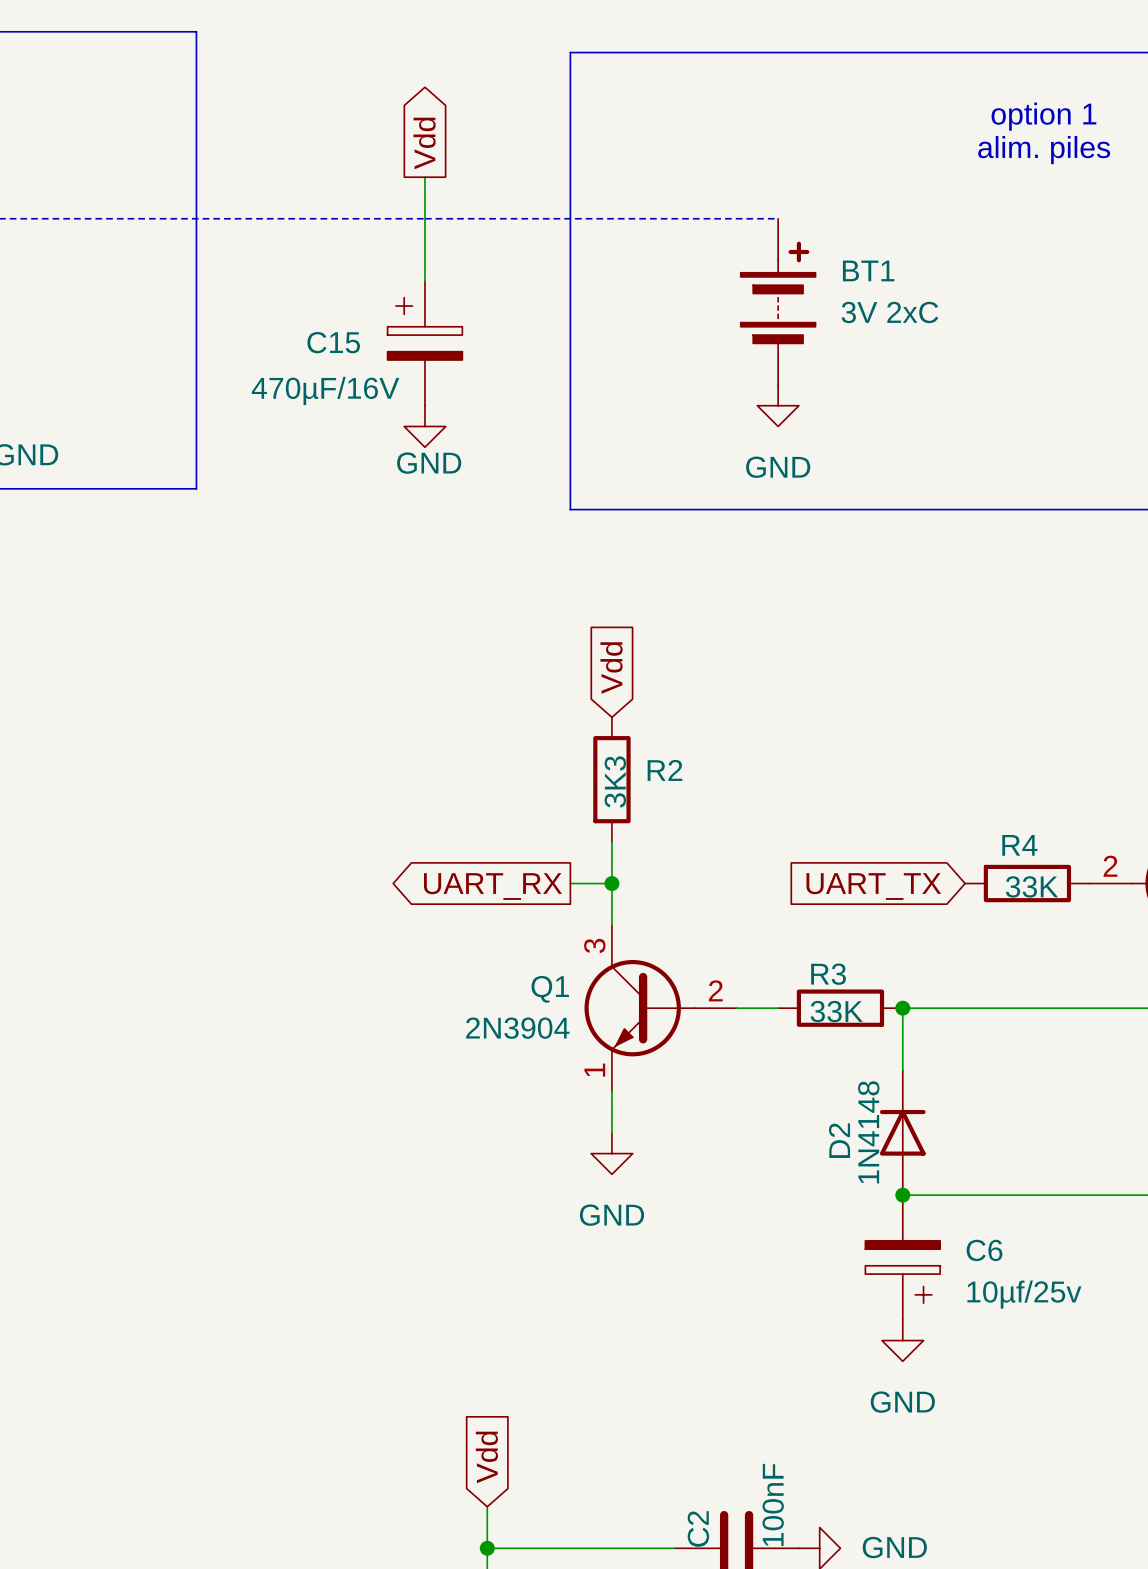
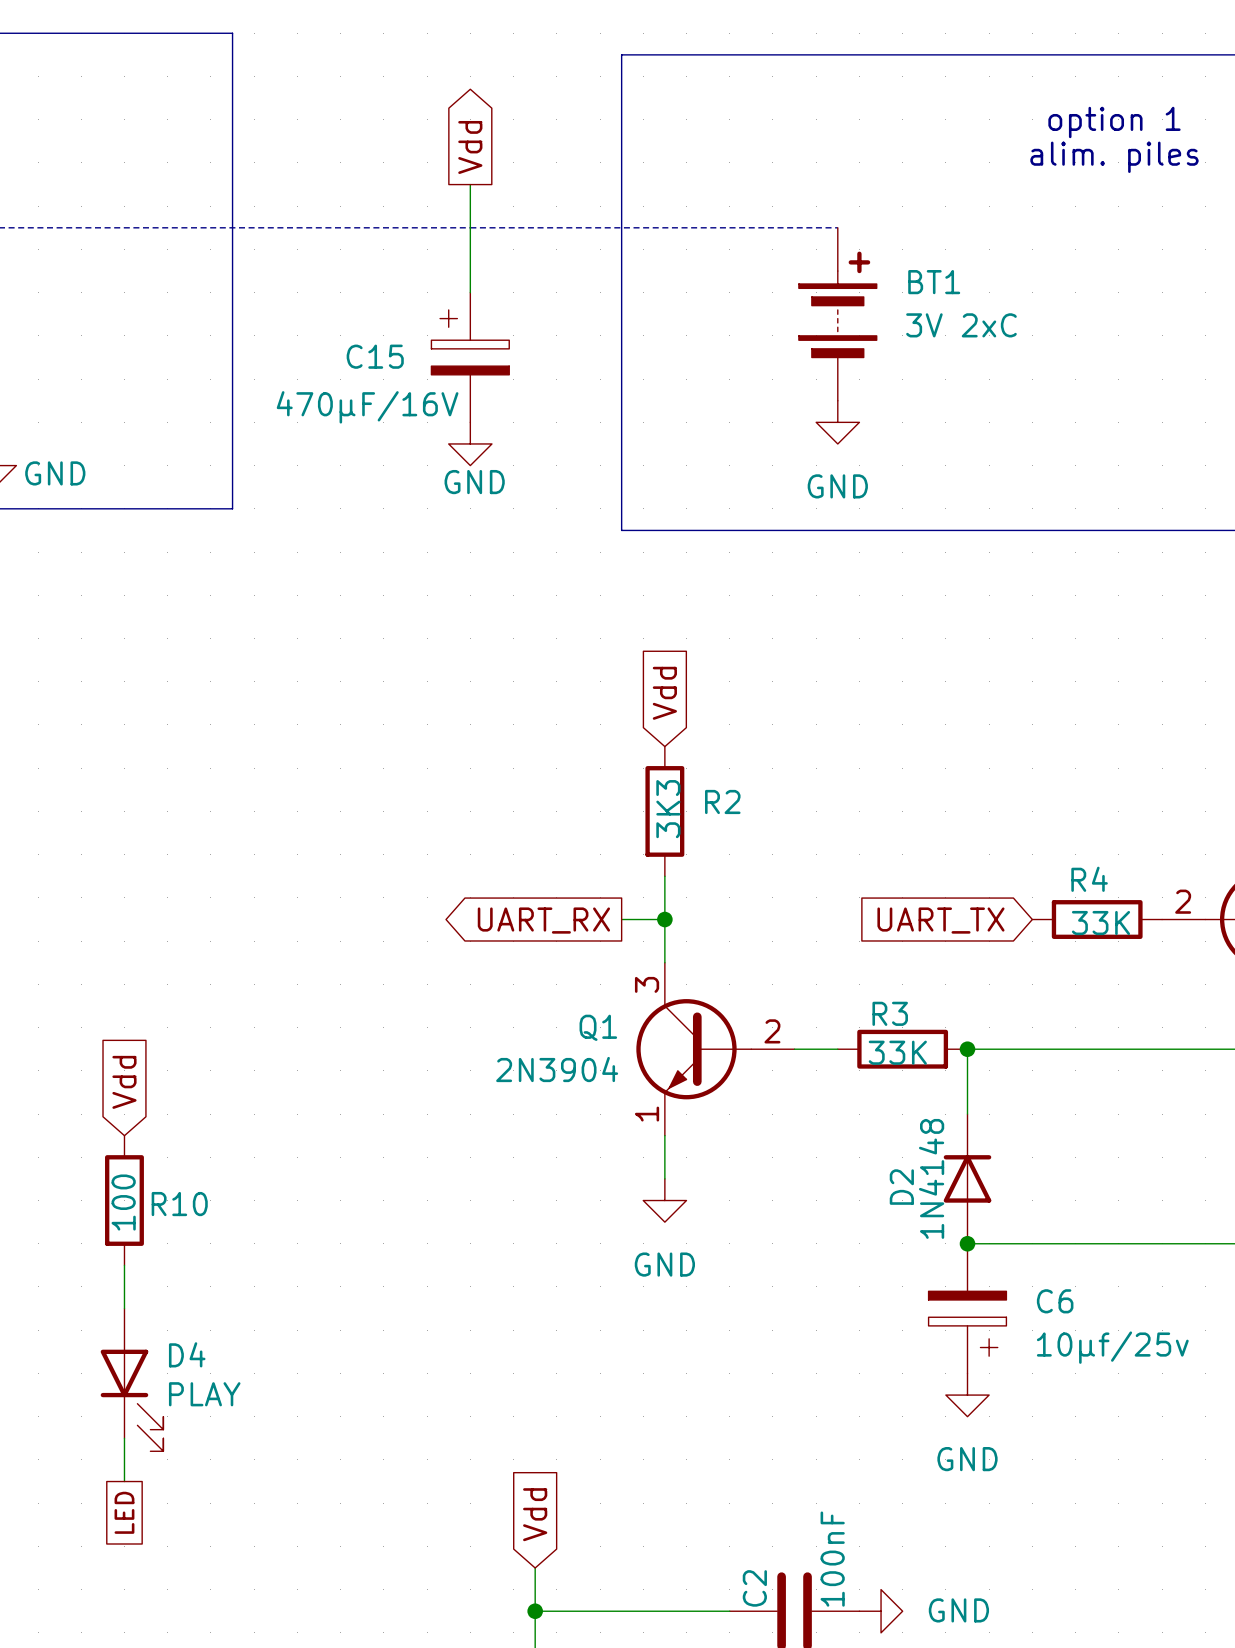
global label: none -> Vdd (124, 1082)
R10: none -> 100 (124, 1200)
wire: none -> (124, 1265) (124, 1308)
D4: none -> PLAY (132, 1379)
wire: none -> (124, 1438) (124, 1481)
global label: none -> LED (124, 1512)

